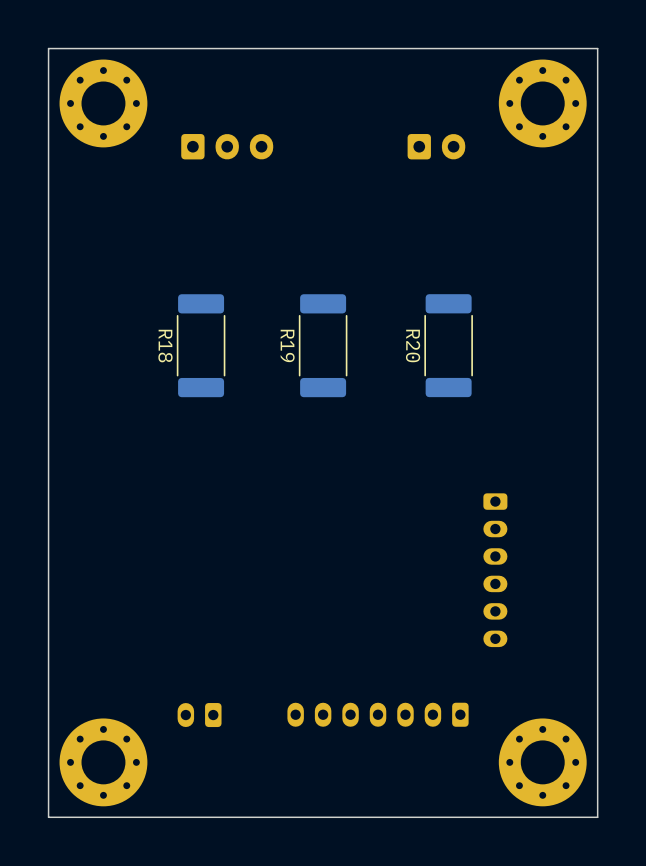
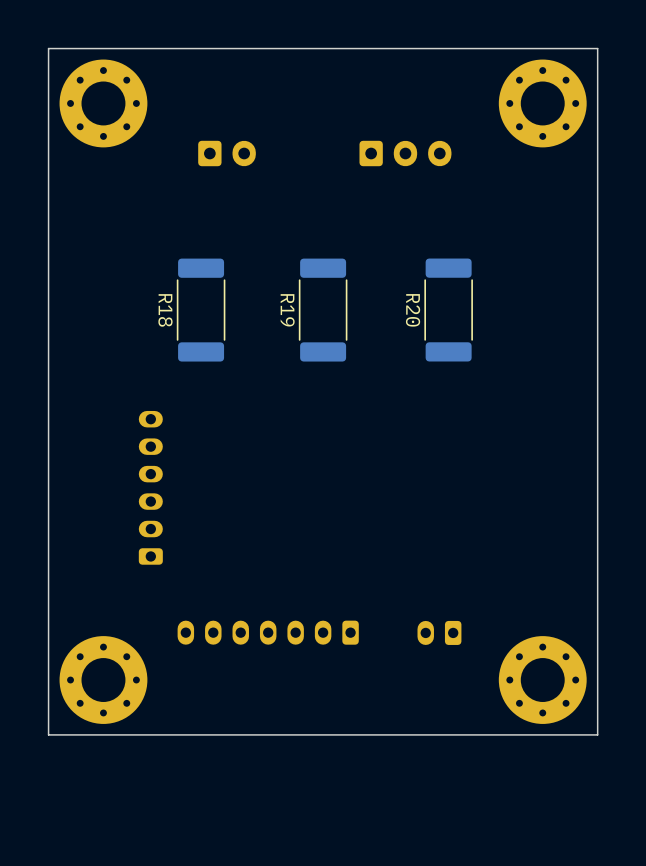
part footprint: [181, 134, 274, 160] -> [198, 140, 256, 167]
part: (436, 146) -> none
part: none -> (405, 153)
R18 position: (201, 345) -> (201, 310)
R19 position: (323, 345) -> (323, 310)
R20 position: (448, 345) -> (448, 310)
part: none -> (150, 487)
part: (495, 570) -> none
part position: (378, 714) -> (268, 632)
part position: (199, 715) -> (439, 632)
board edge: (597, 734) (597, 817) (48, 817) (48, 734) -> (597, 734) (48, 734)
part position: (103, 762) -> (103, 680)
part position: (542, 762) -> (542, 680)

